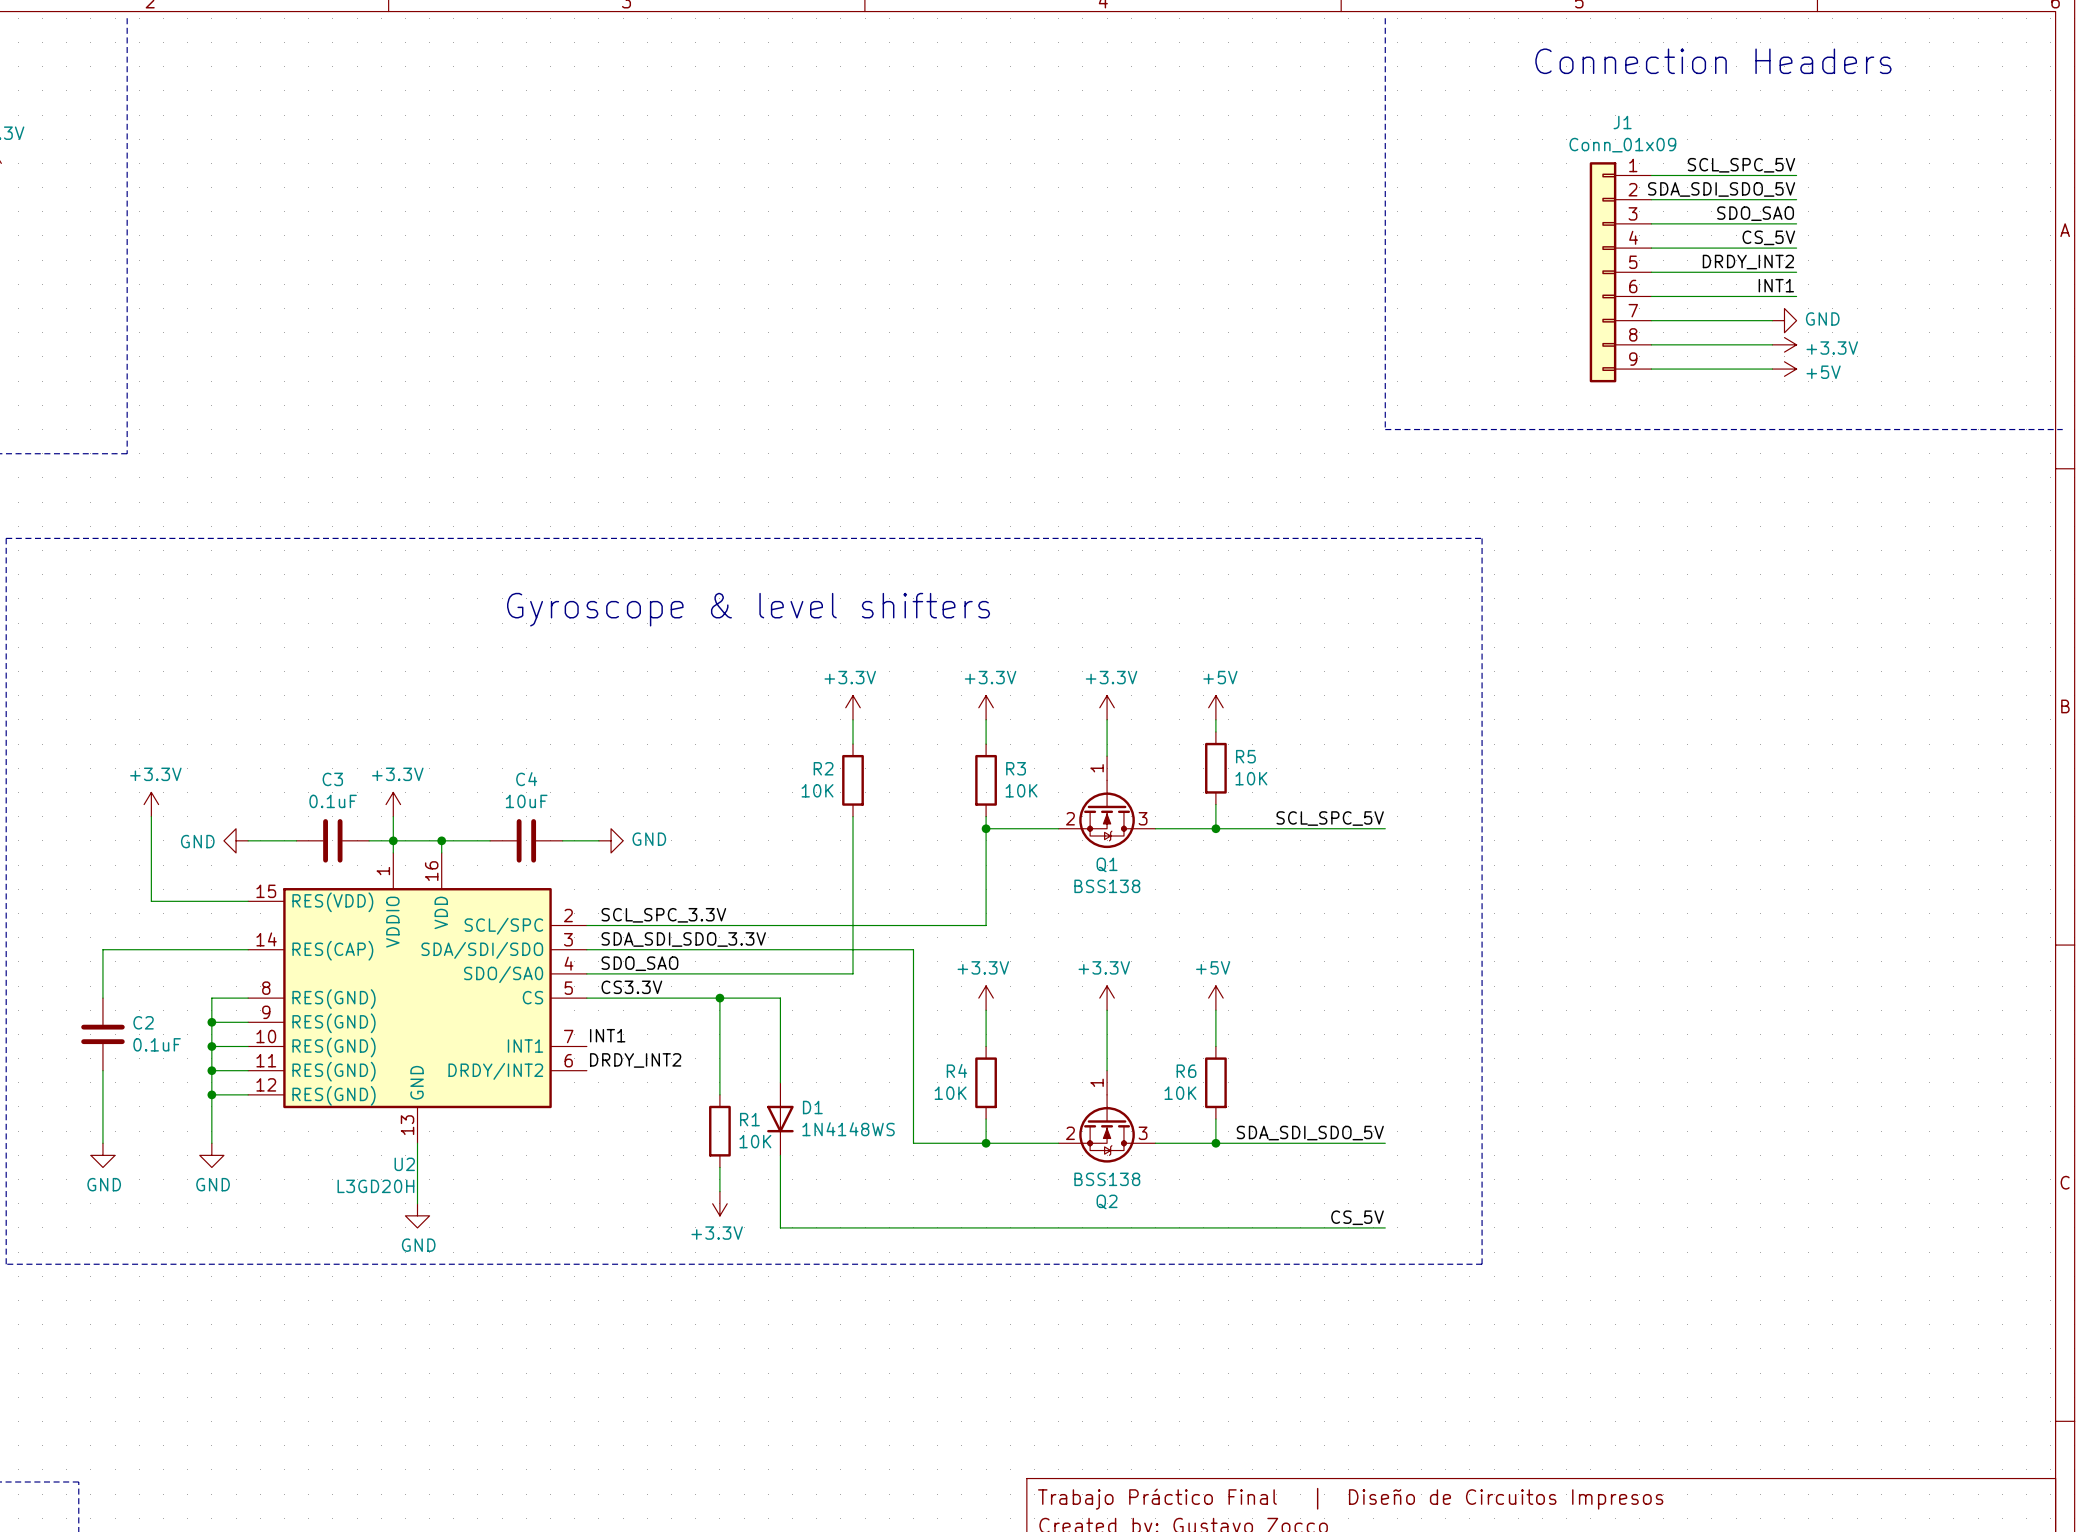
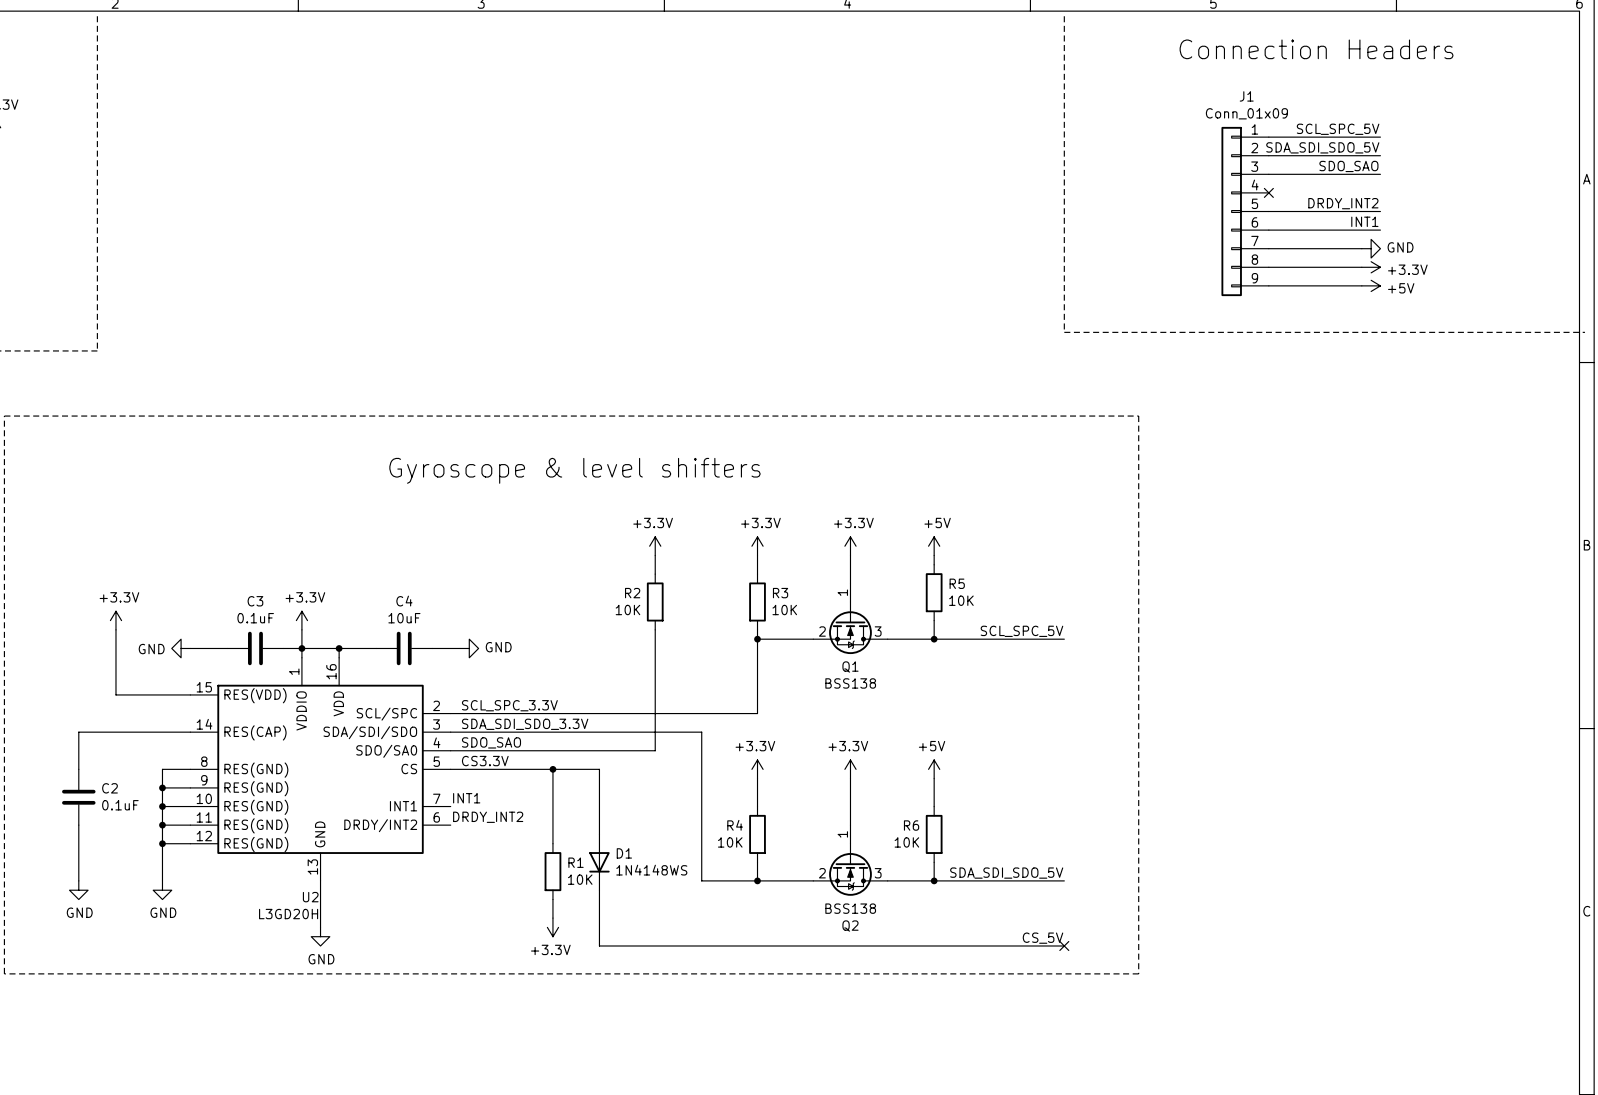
label: CS_5V (1768, 237) -> none
wire: (1651, 248) (1796, 248) -> none
no-connect mark: none -> (1268, 192)
no-connect mark: none -> (1064, 945)

